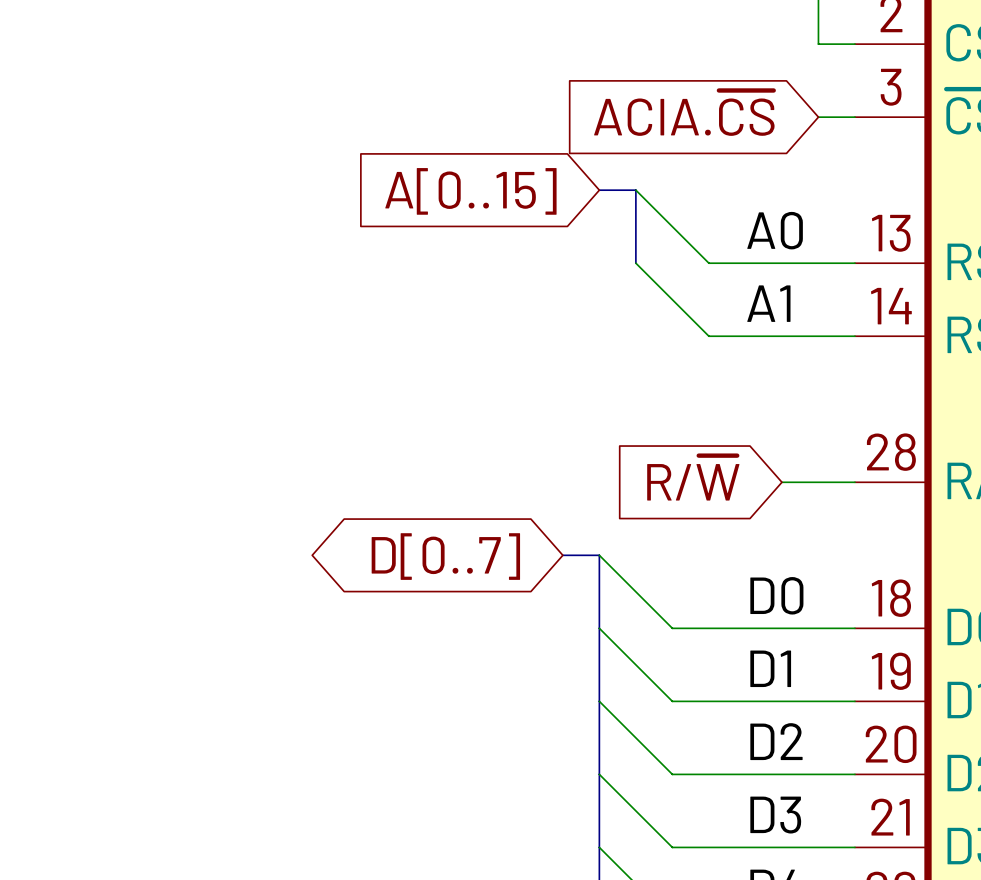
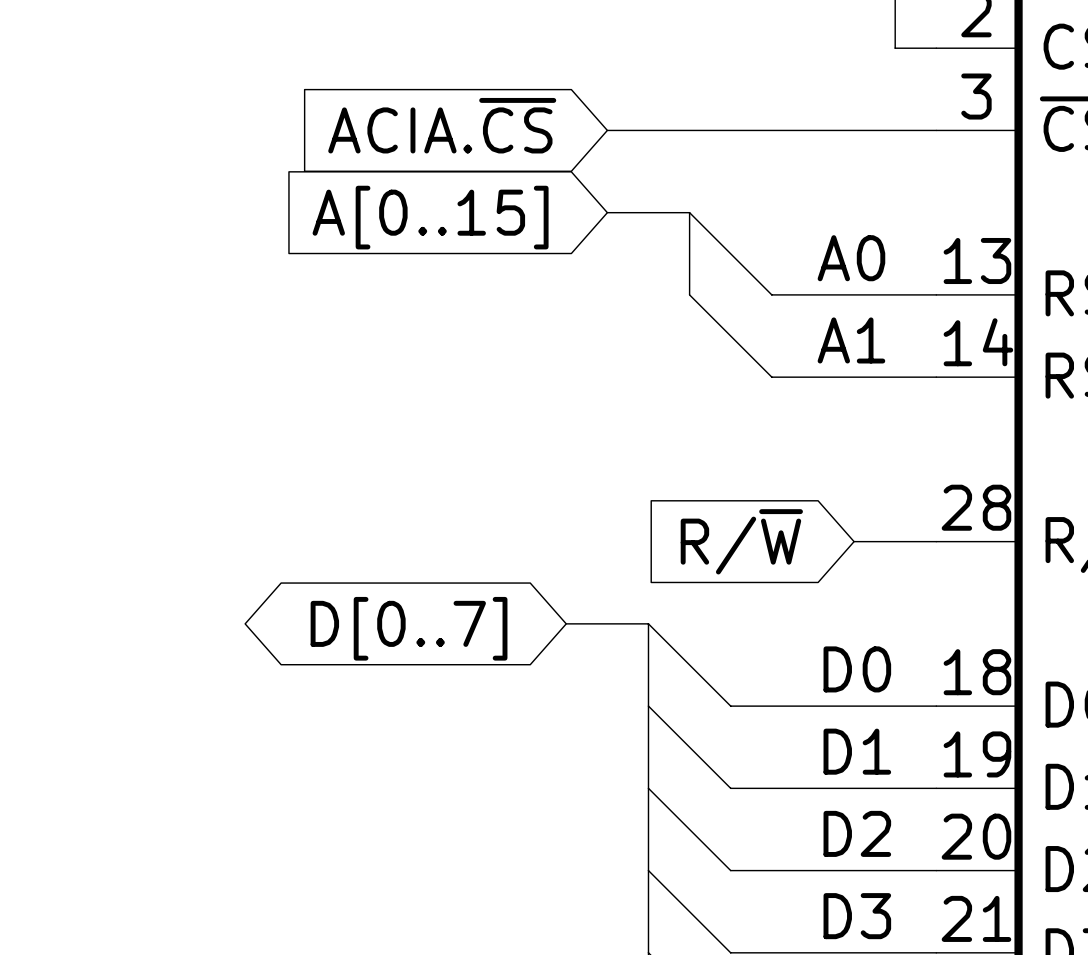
global label position: ACIA.~{CS} (684, 113) -> ACIA.~{CS} (442, 125)
wire: none -> (607, 130) (895, 130)
bus: none -> (607, 212) (648, 212)
global label position: A[0..15] (470, 191) -> A[0..15] (430, 217)
bus: none -> (566, 623) (607, 623)
global label position: D[0..7] (445, 556) -> D[0..7] (409, 628)

